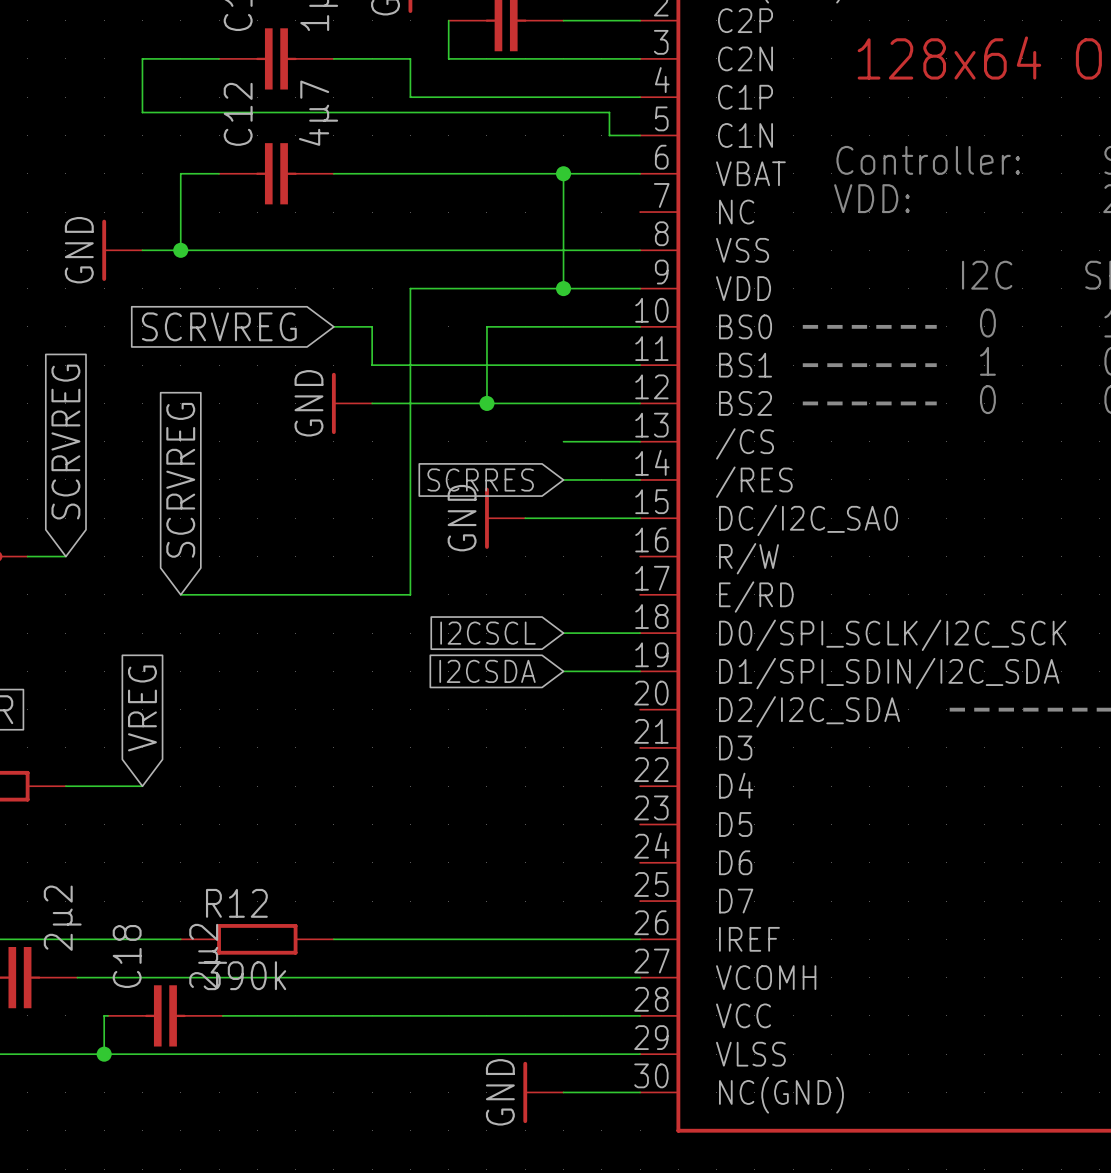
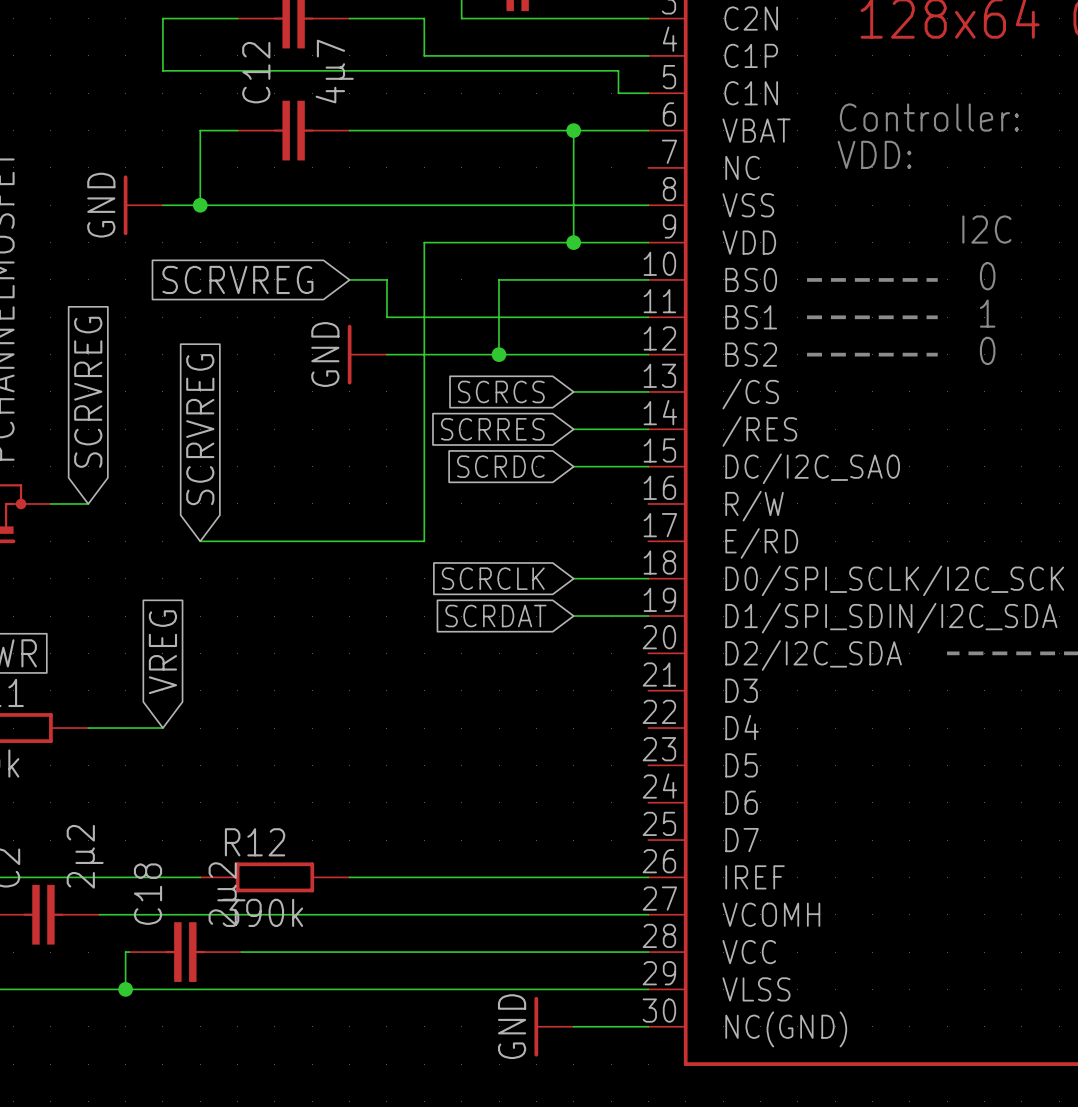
global label: none -> SCRCS (501, 391)
global label: none -> SCRDC (500, 466)
power symbol: GND (505, 518) -> none
wire: (525, 518) (563, 518) -> none
global label: I2CSCL (487, 633) -> SCRCLK (493, 578)
global label: I2CSDA (487, 671) -> SCRDAT (495, 616)

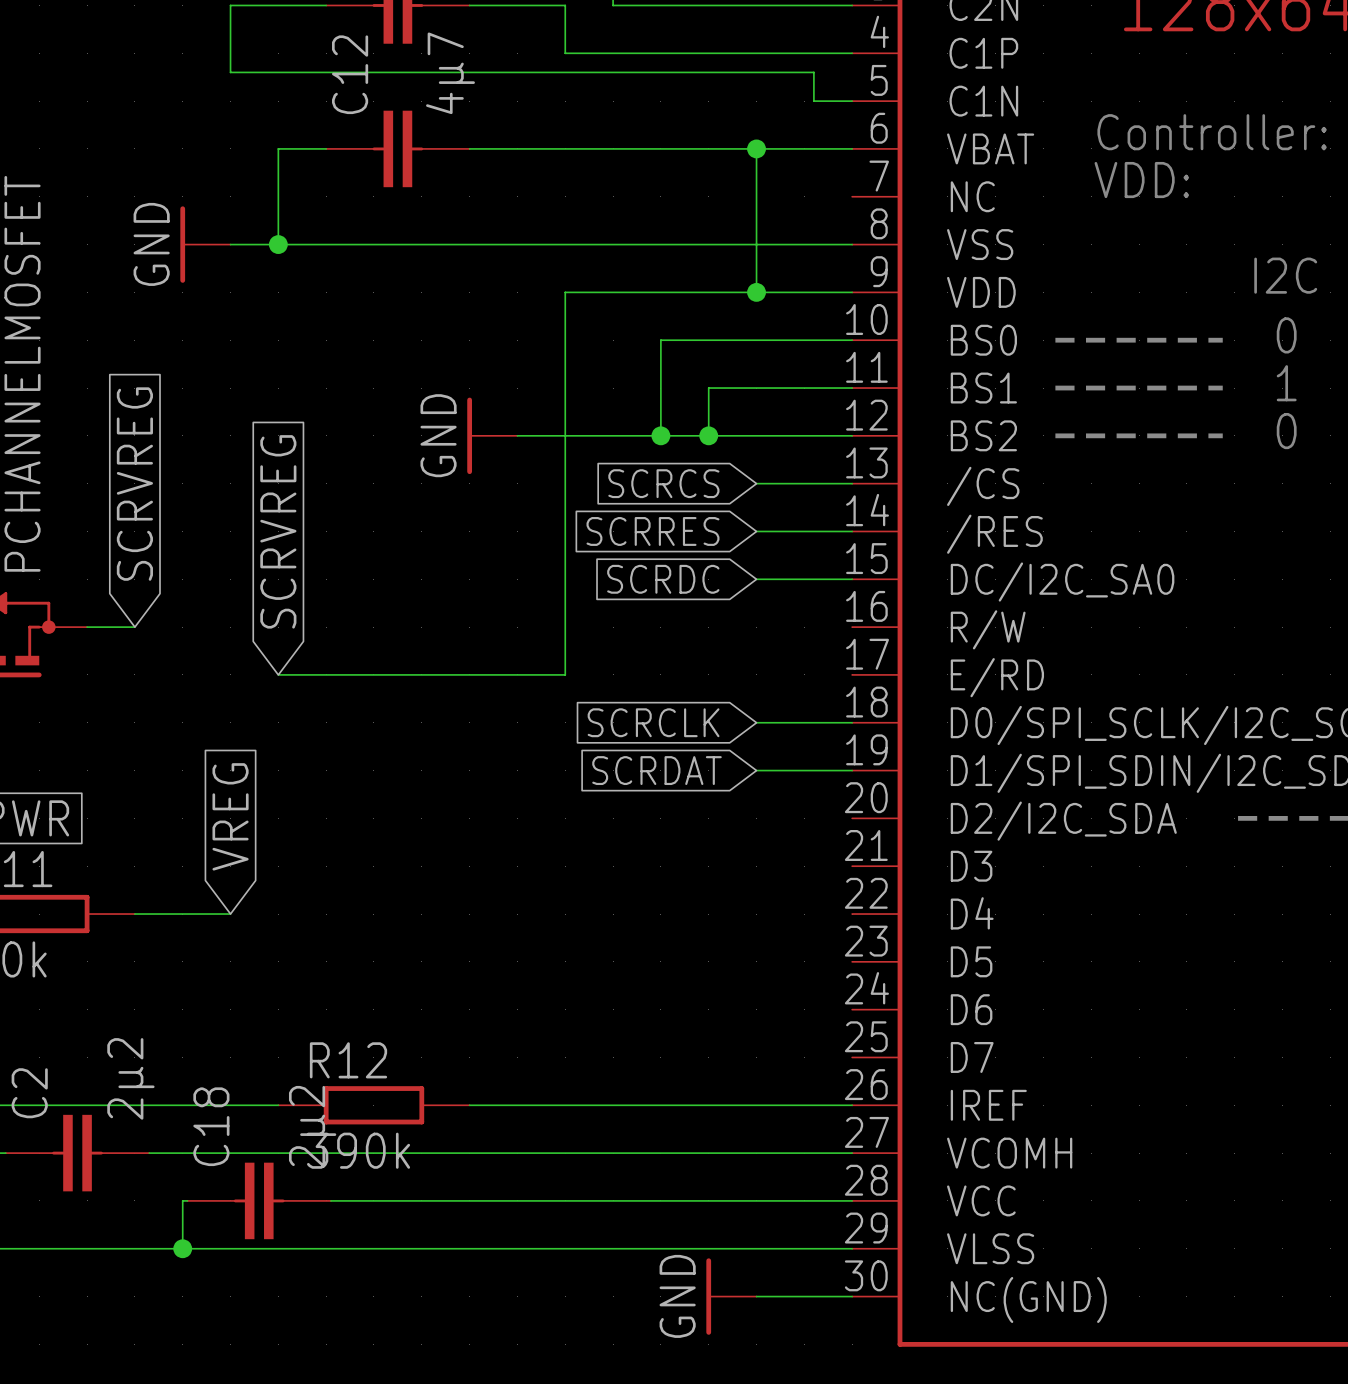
global label: SCRVREG (237, 279) -> none
wire: (349, 279) (386, 279) (386, 317) (536, 317) -> (708, 435) (708, 388)
junction: none -> (708, 435)

